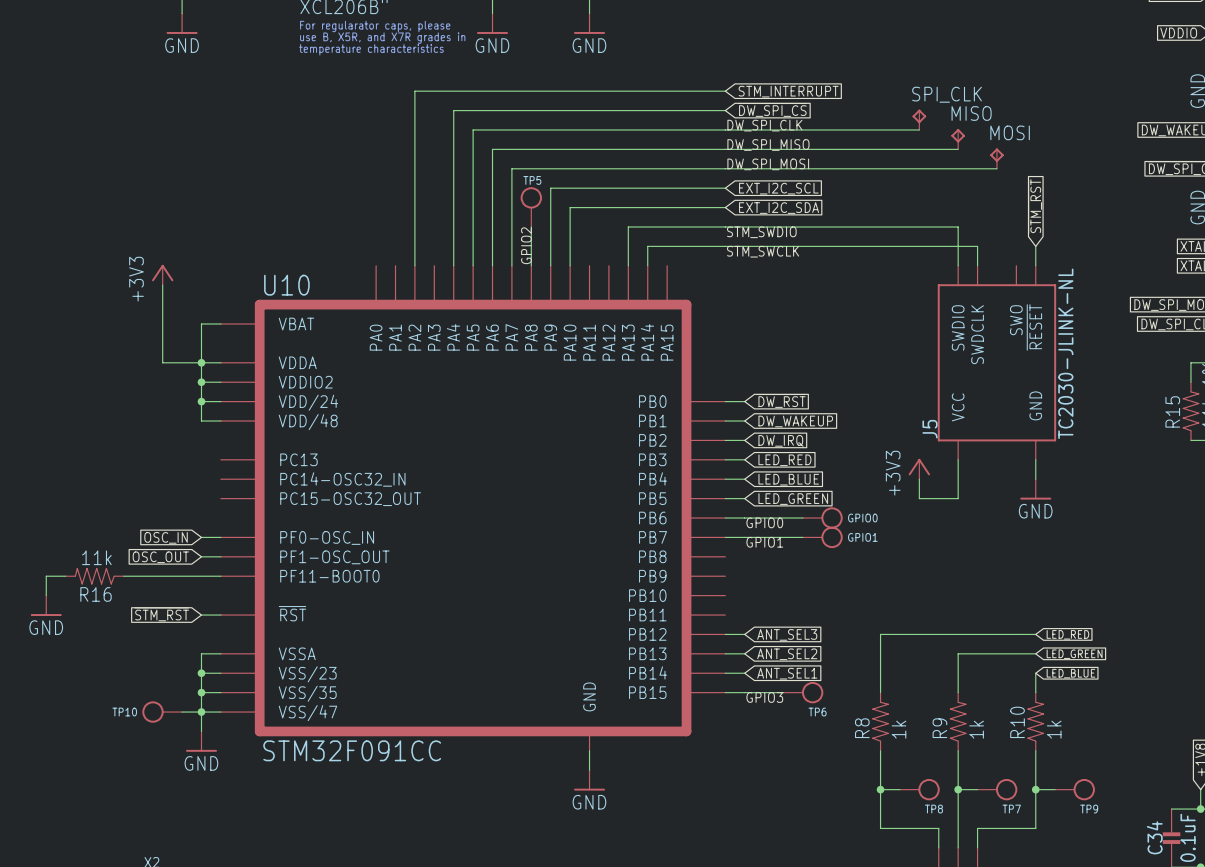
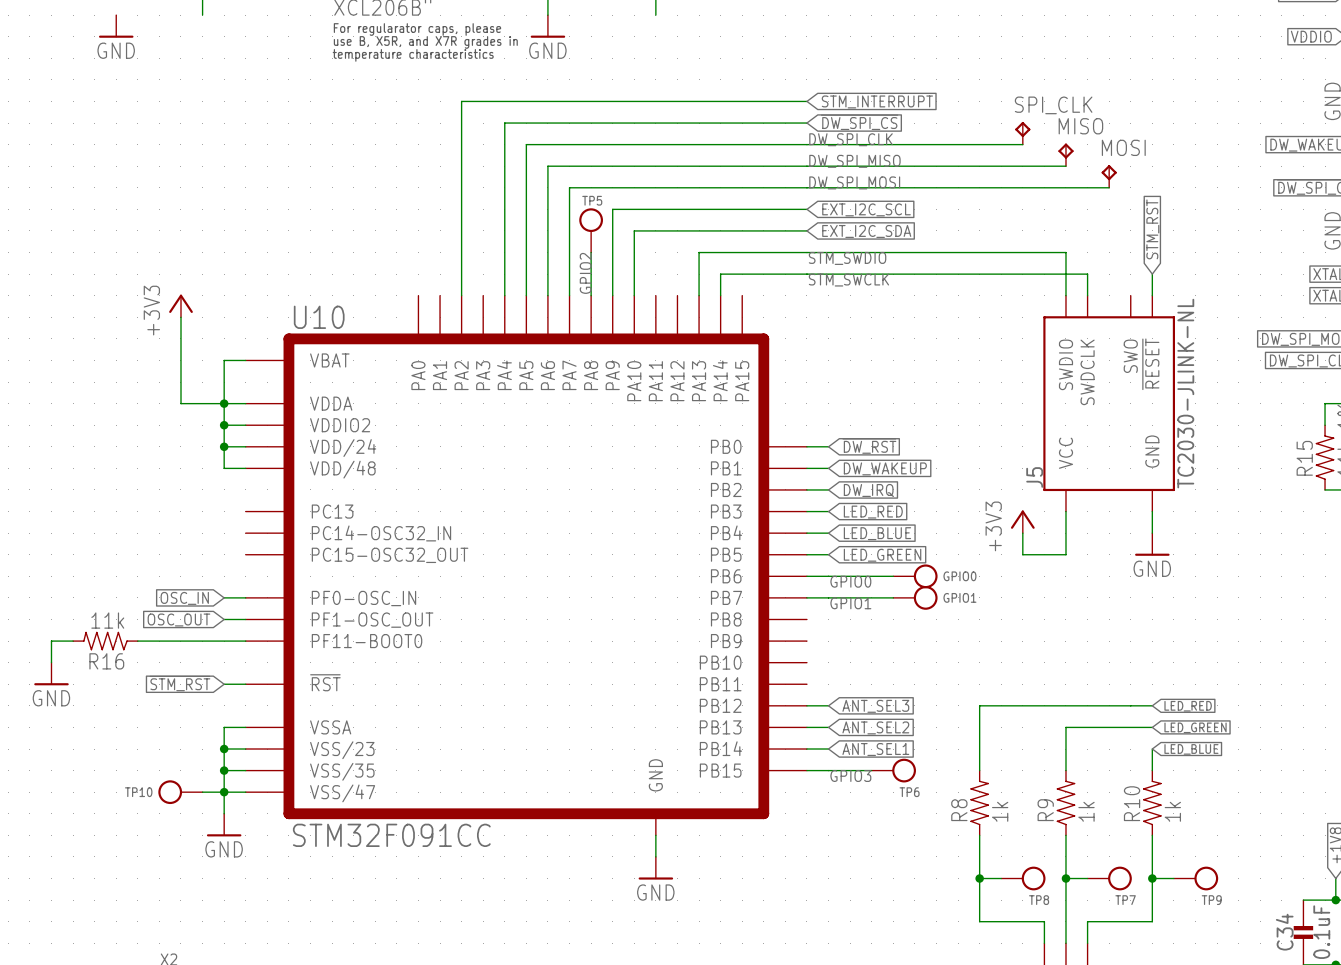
power symbol position: GND (182, 23) -> GND (116, 26)
power symbol: GND (589, 23) -> none

